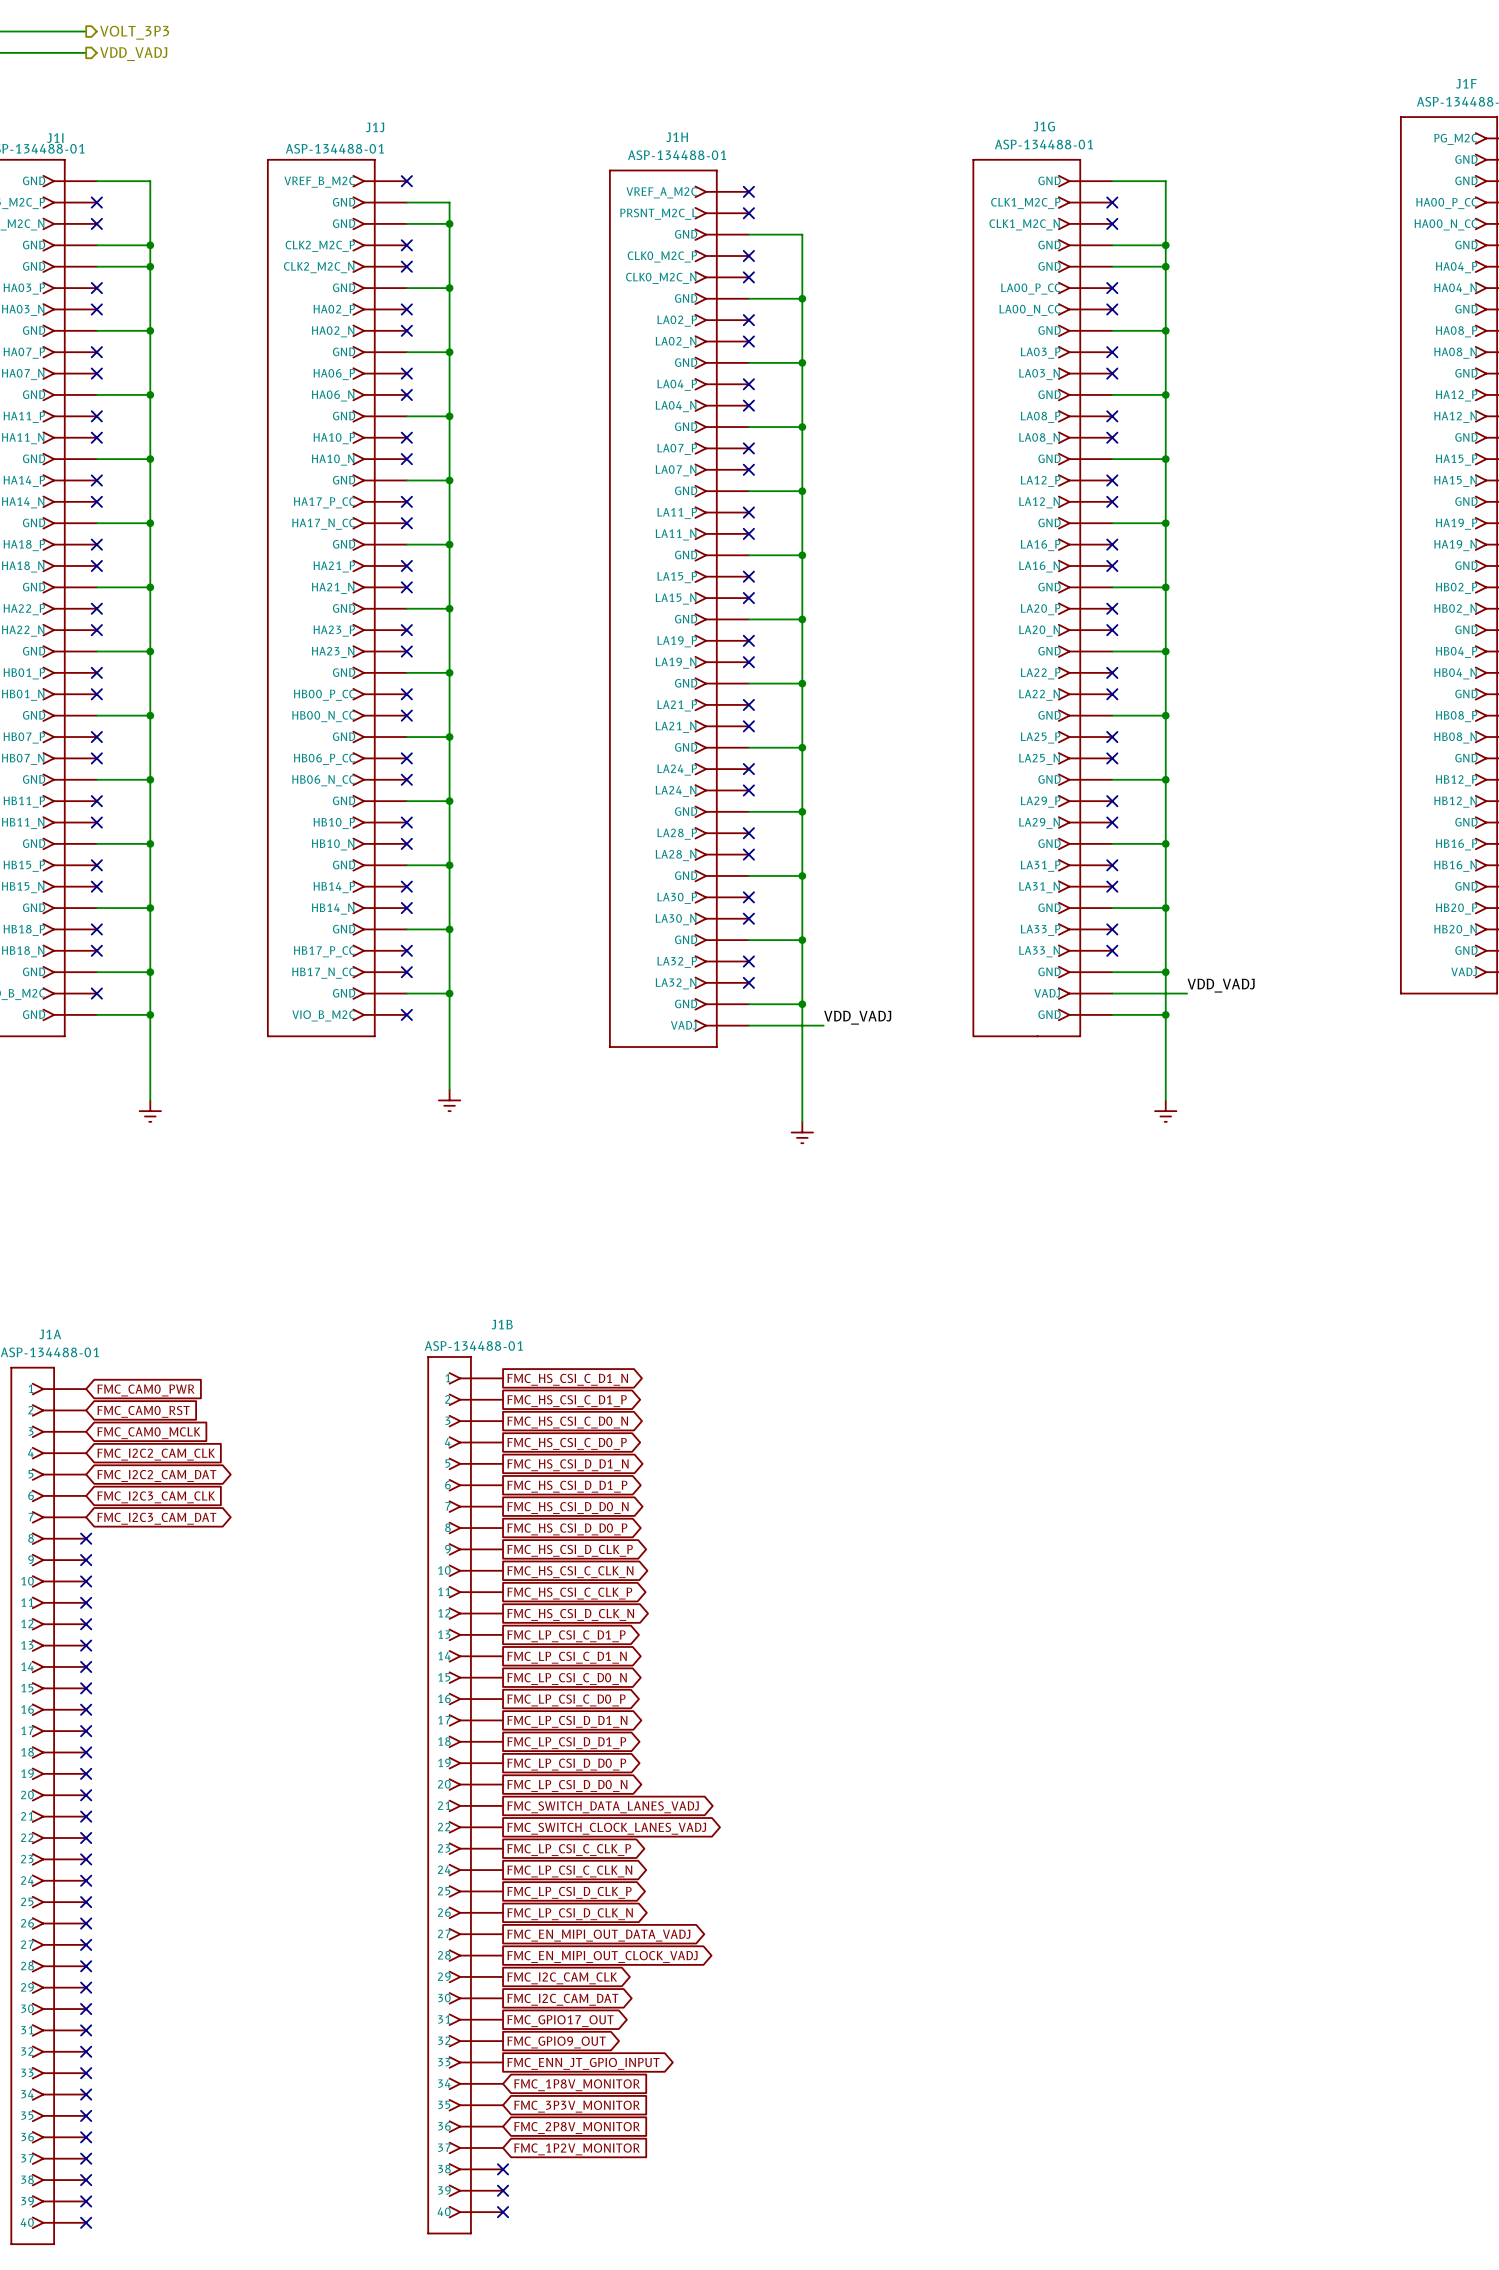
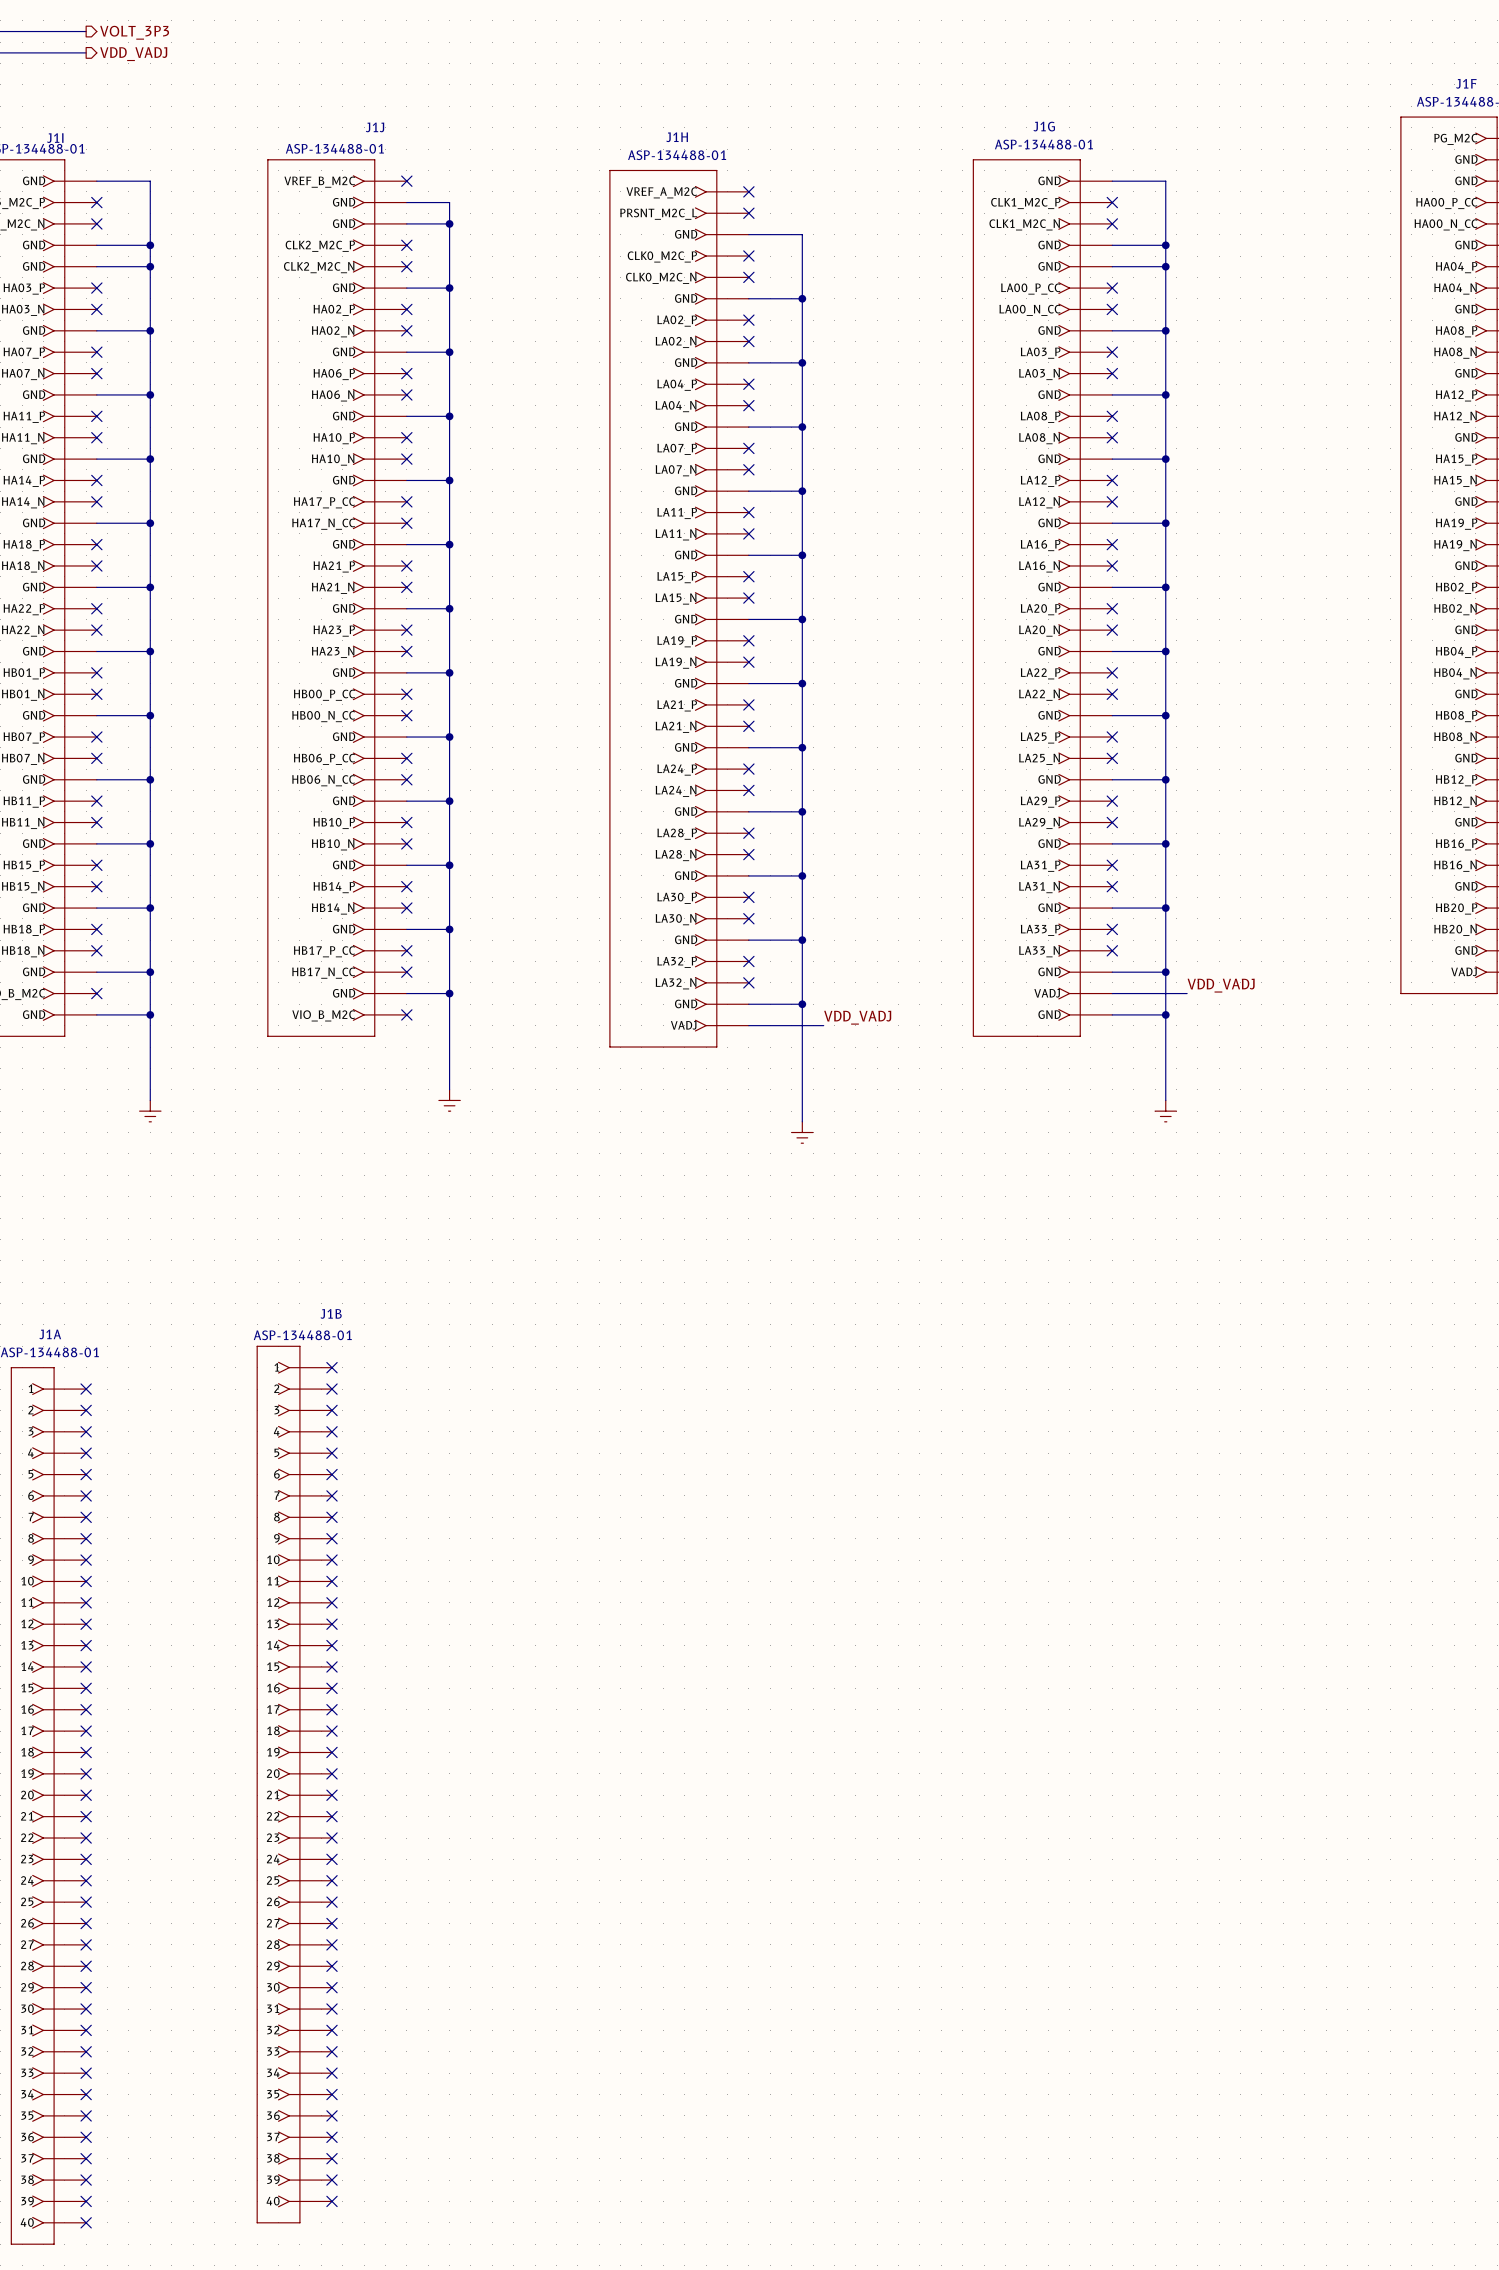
no-connect mark: none -> (332, 1367)
global label: FMC_HS_CSI_C_D1_N (567, 1379) -> none
no-connect mark: none -> (86, 1389)
no-connect mark: none -> (332, 1389)
global label: FMC_CAM0_PWR (146, 1390) -> none
global label: FMC_HS_CSI_C_D1_P (567, 1401) -> none
no-connect mark: none -> (86, 1410)
no-connect mark: none -> (332, 1410)
global label: FMC_CAM0_RST (143, 1411) -> none
global label: FMC_HS_CSI_C_D0_N (567, 1422) -> none
no-connect mark: none -> (86, 1431)
no-connect mark: none -> (332, 1431)
global label: FMC_CAM0_MCLK (148, 1433) -> none
global label: FMC_HS_CSI_C_D0_P (567, 1443) -> none
no-connect mark: none -> (86, 1453)
no-connect mark: none -> (332, 1453)
global label: FMC_I2C2_CAM_CLK (156, 1454) -> none
global label: FMC_HS_CSI_D_D1_N (568, 1465) -> none
no-connect mark: none -> (86, 1474)
no-connect mark: none -> (332, 1474)
global label: FMC_I2C2_CAM_DAT (156, 1475) -> none
global label: FMC_HS_CSI_D_D1_P (567, 1486) -> none
no-connect mark: none -> (86, 1495)
no-connect mark: none -> (332, 1495)
global label: FMC_I2C3_CAM_CLK (156, 1497) -> none
global label: FMC_HS_CSI_D_D0_N (568, 1508) -> none
no-connect mark: none -> (86, 1517)
no-connect mark: none -> (332, 1517)
global label: FMC_I2C3_CAM_DAT (156, 1518) -> none
global label: FMC_HS_CSI_D_D0_P (567, 1529) -> none
no-connect mark: none -> (332, 1538)
global label: FMC_HS_CSI_D_CLK_P (570, 1550) -> none
no-connect mark: none -> (332, 1560)
global label: FMC_HS_CSI_C_CLK_N (570, 1572) -> none
no-connect mark: none -> (332, 1581)
global label: FMC_HS_CSI_C_CLK_P (569, 1593) -> none
no-connect mark: none -> (332, 1602)
global label: FMC_HS_CSI_D_CLK_N (570, 1614) -> none
no-connect mark: none -> (332, 1624)
global label: FMC_LP_CSI_C_D1_P (566, 1636) -> none
no-connect mark: none -> (332, 1645)
global label: FMC_LP_CSI_C_D1_N (567, 1657) -> none
no-connect mark: none -> (332, 1666)
global label: FMC_LP_CSI_C_D0_N (567, 1679) -> none
no-connect mark: none -> (332, 1688)
global label: FMC_LP_CSI_C_D0_P (566, 1700) -> none
no-connect mark: none -> (332, 1709)
global label: FMC_LP_CSI_D_D1_N (567, 1721) -> none
no-connect mark: none -> (332, 1731)
global label: FMC_LP_CSI_D_D1_P (566, 1743) -> none
no-connect mark: none -> (332, 1752)
global label: FMC_LP_CSI_D_D0_P (566, 1764) -> none
no-connect mark: none -> (332, 1773)
global label: FMC_LP_CSI_D_D0_N (567, 1785) -> none
no-connect mark: none -> (332, 1795)
J1B position: (465, 1795) -> (294, 1784)
global label: FMC_SWITCH_DATA_LANES_VADJ (603, 1807) -> none
no-connect mark: none -> (332, 1816)
global label: FMC_SWITCH_CLOCK_LANES_VADJ (606, 1828) -> none
no-connect mark: none -> (332, 1838)
global label: FMC_LP_CSI_C_CLK_P (569, 1850) -> none
no-connect mark: none -> (332, 1859)
global label: FMC_LP_CSI_C_CLK_N (569, 1871) -> none
no-connect mark: none -> (332, 1880)
global label: FMC_LP_CSI_D_CLK_P (569, 1892) -> none
no-connect mark: none -> (332, 1902)
global label: FMC_LP_CSI_D_CLK_N (570, 1914) -> none
no-connect mark: none -> (332, 1923)
global label: FMC_EN_MIPI_OUT_DATA_VADJ (598, 1935) -> none
no-connect mark: none -> (332, 1944)
global label: FMC_EN_MIPI_OUT_CLOCK_VADJ (602, 1956) -> none
no-connect mark: none -> (332, 1966)
global label: FMC_I2C_CAM_CLK (562, 1978) -> none
no-connect mark: none -> (332, 1987)
global label: FMC_I2C_CAM_DAT (562, 1999) -> none
no-connect mark: none -> (332, 2009)
global label: FMC_GPIO17_OUT (560, 2021) -> none
no-connect mark: none -> (332, 2030)
global label: FMC_GPIO9_OUT (556, 2042) -> none
no-connect mark: none -> (332, 2051)
global label: FMC_ENN_JT_GPIO_INPUT (583, 2063) -> none
no-connect mark: none -> (332, 2073)
global label: FMC_1P8V_MONITOR (577, 2085) -> none
no-connect mark: none -> (332, 2094)
global label: FMC_3P3V_MONITOR (577, 2106) -> none
no-connect mark: none -> (332, 2115)
global label: FMC_2P8V_MONITOR (577, 2127) -> none
no-connect mark: none -> (332, 2137)
global label: FMC_1P2V_MONITOR (577, 2149) -> none
no-connect mark: none -> (332, 2158)
no-connect mark: (503, 2169) -> none
no-connect mark: none -> (332, 2180)
no-connect mark: (503, 2190) -> none
no-connect mark: none -> (332, 2201)
no-connect mark: (503, 2212) -> none

